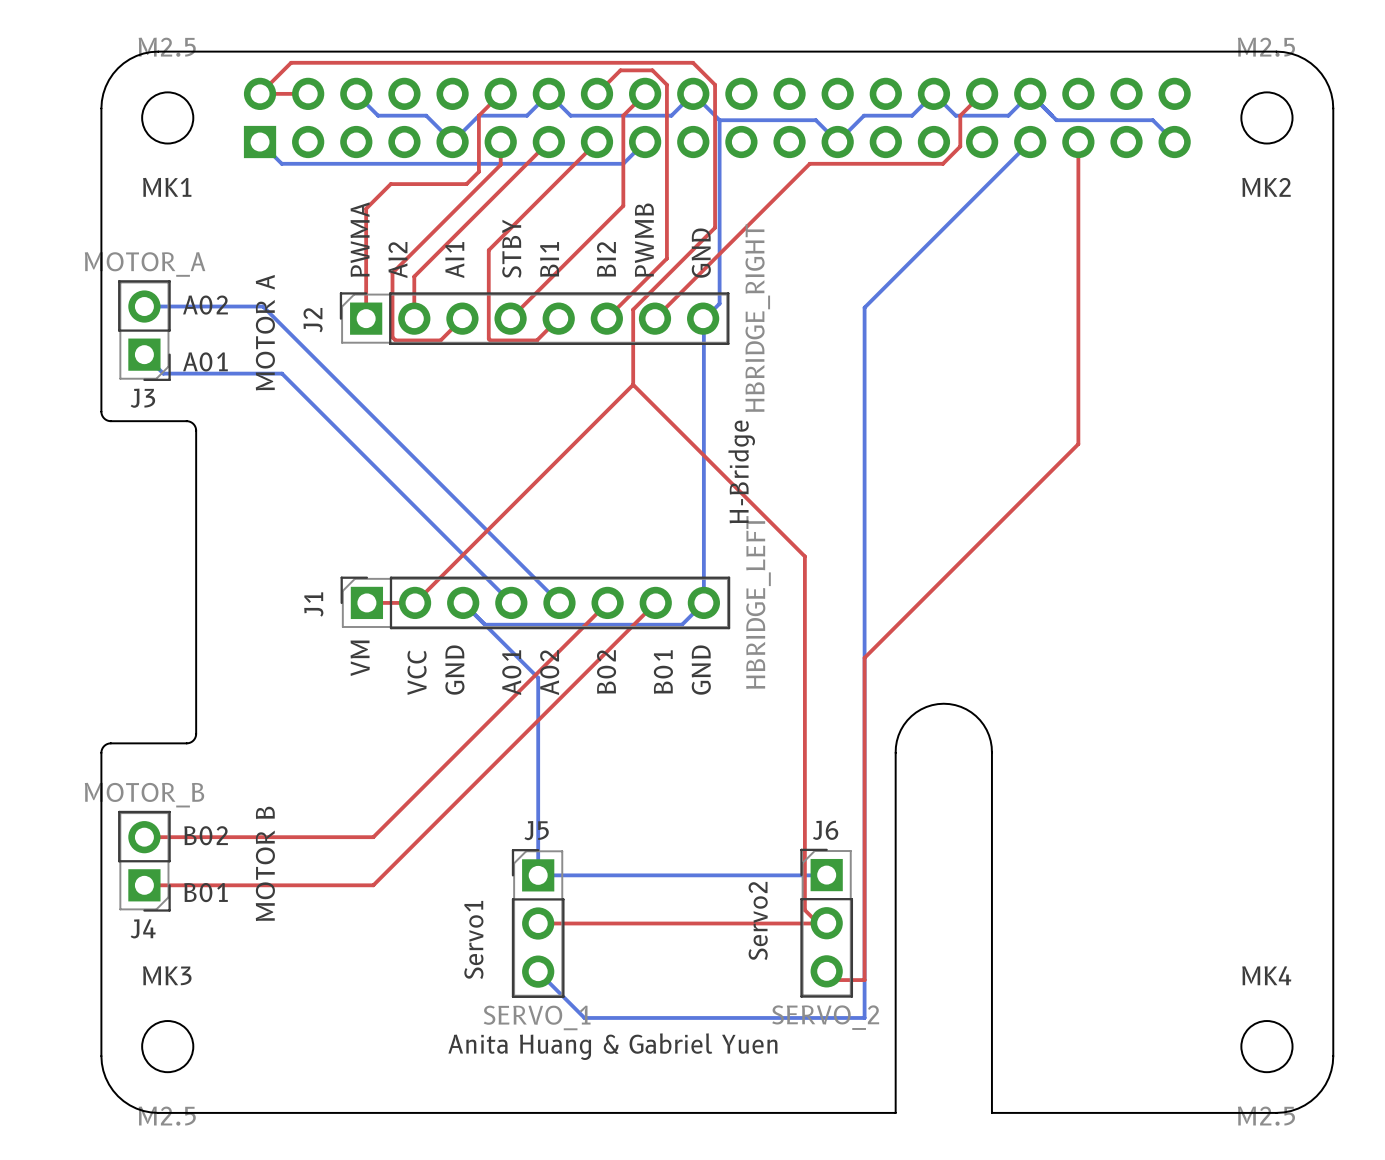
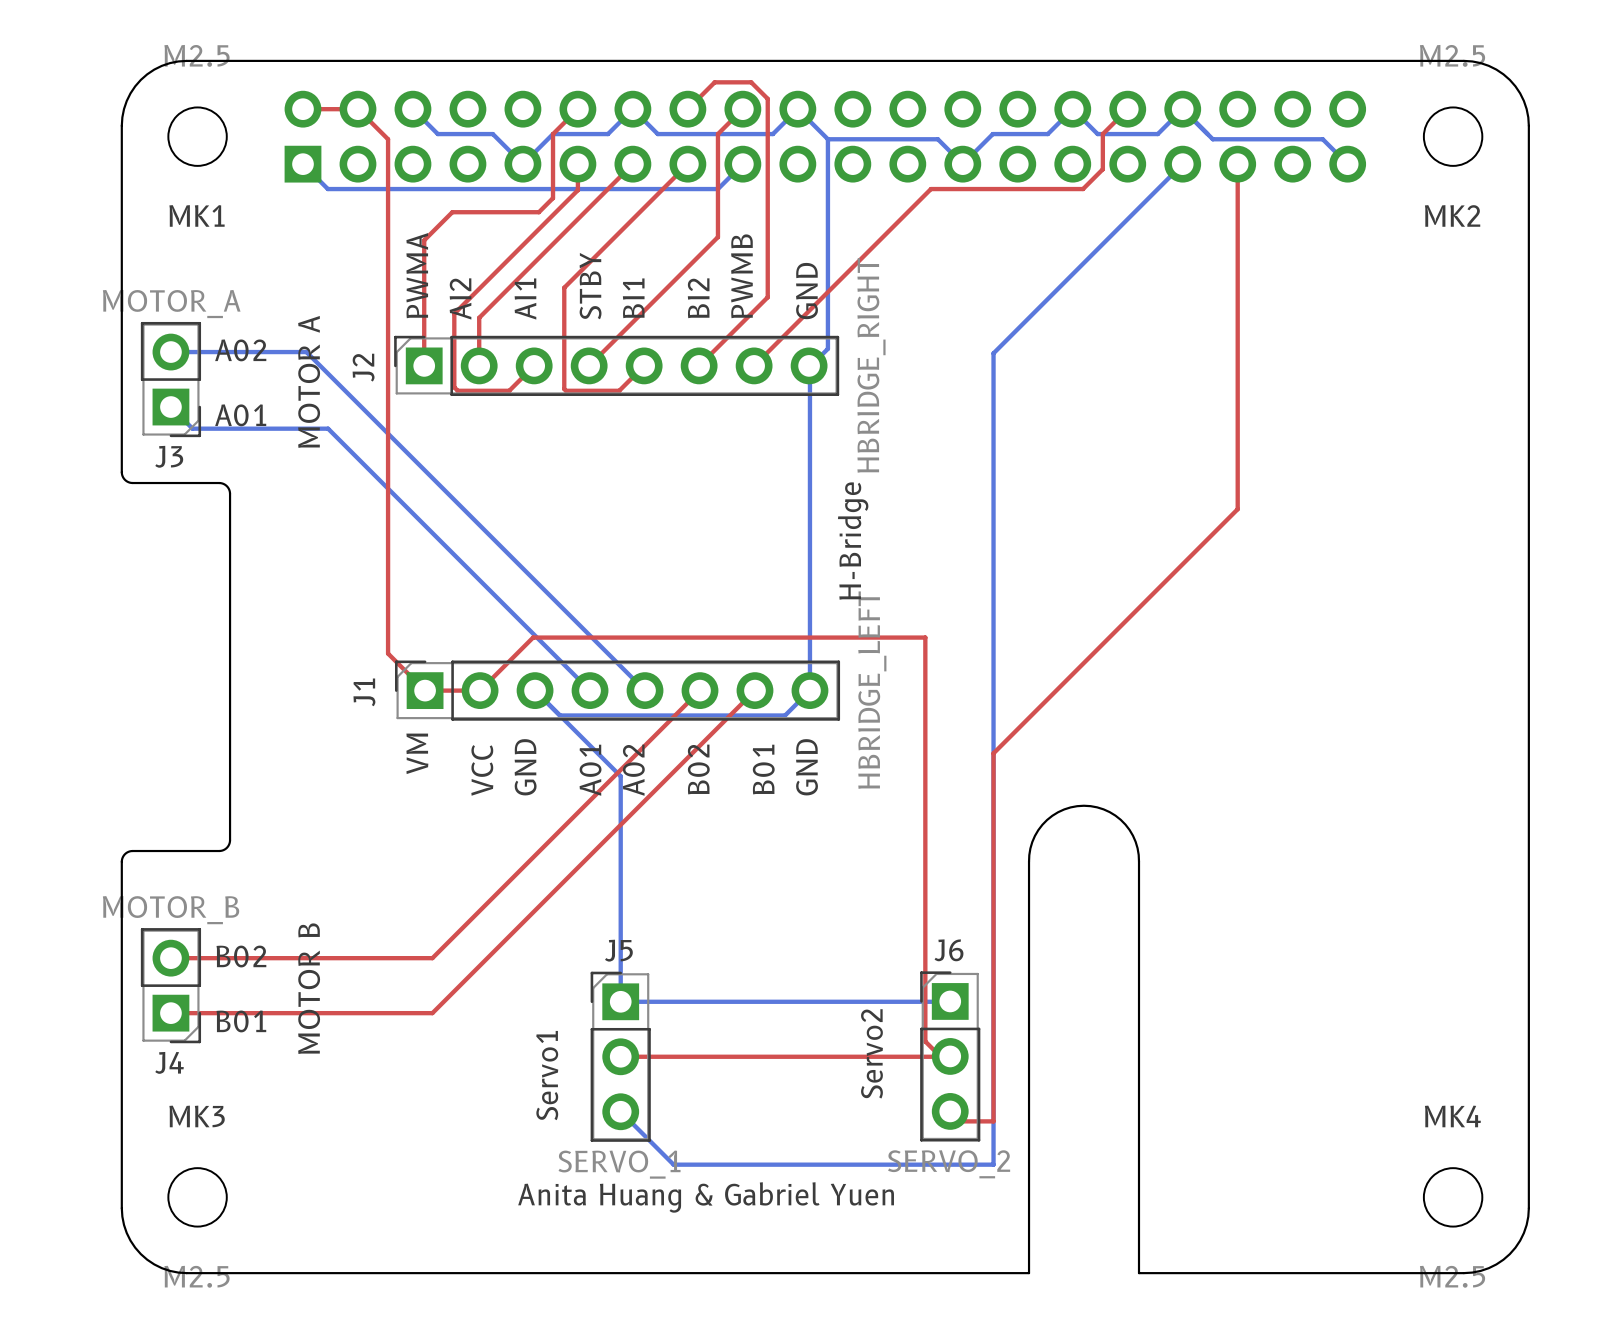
top track: (260, 93) (291, 62) (693, 62) (715, 84) (715, 227) (633, 309) (633, 384) -> none
top track: none -> (360, 109) (357, 109) (388, 139) (388, 653) (425, 690)
top track: (633, 384) (461, 556) -> (925, 637) (533, 637)
top track: (633, 384) (804, 556) -> none

